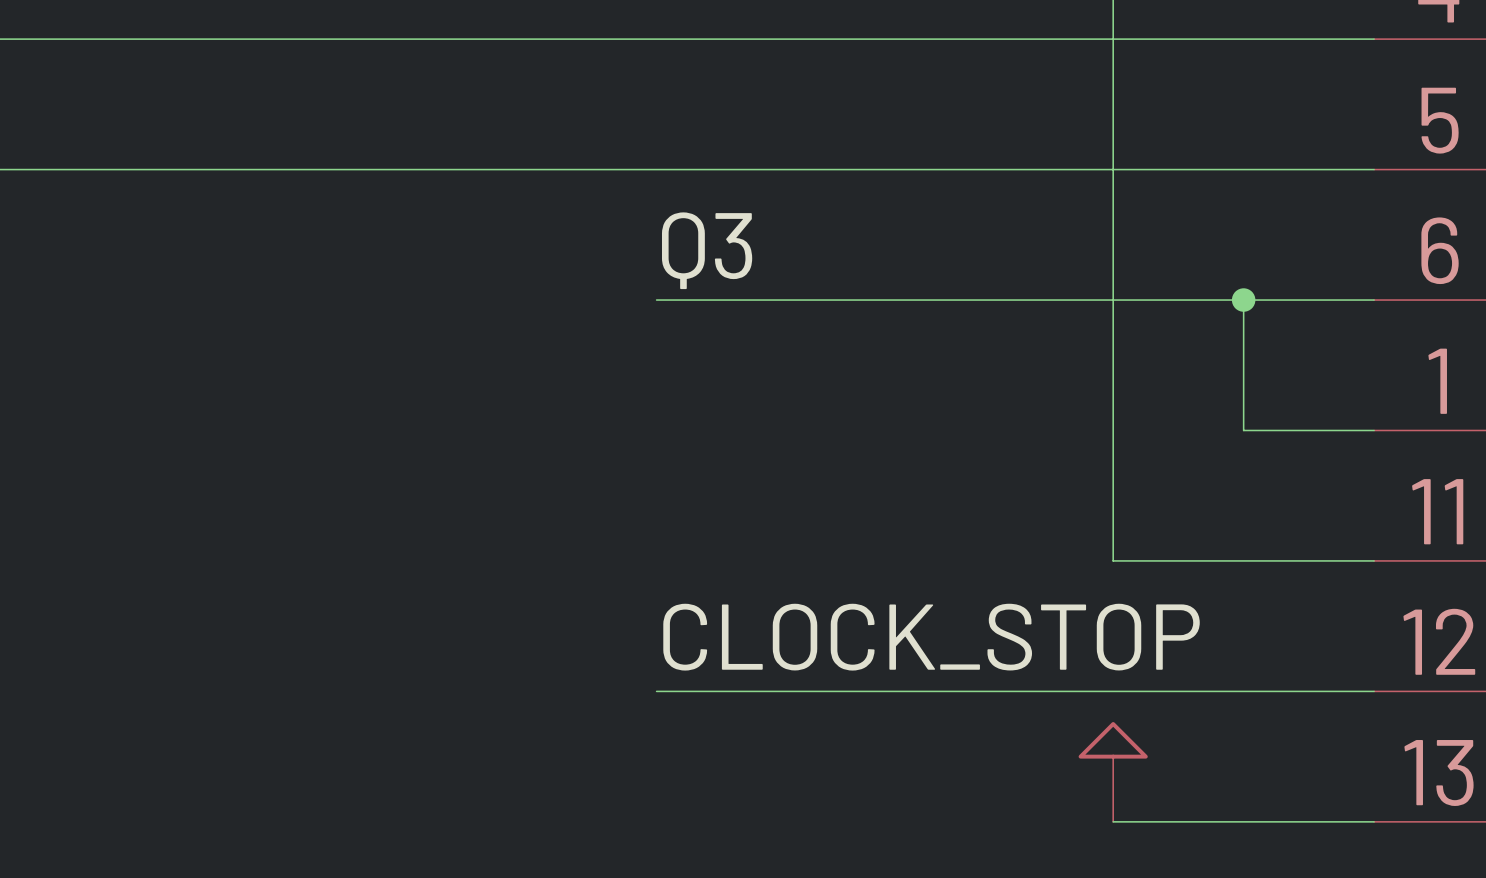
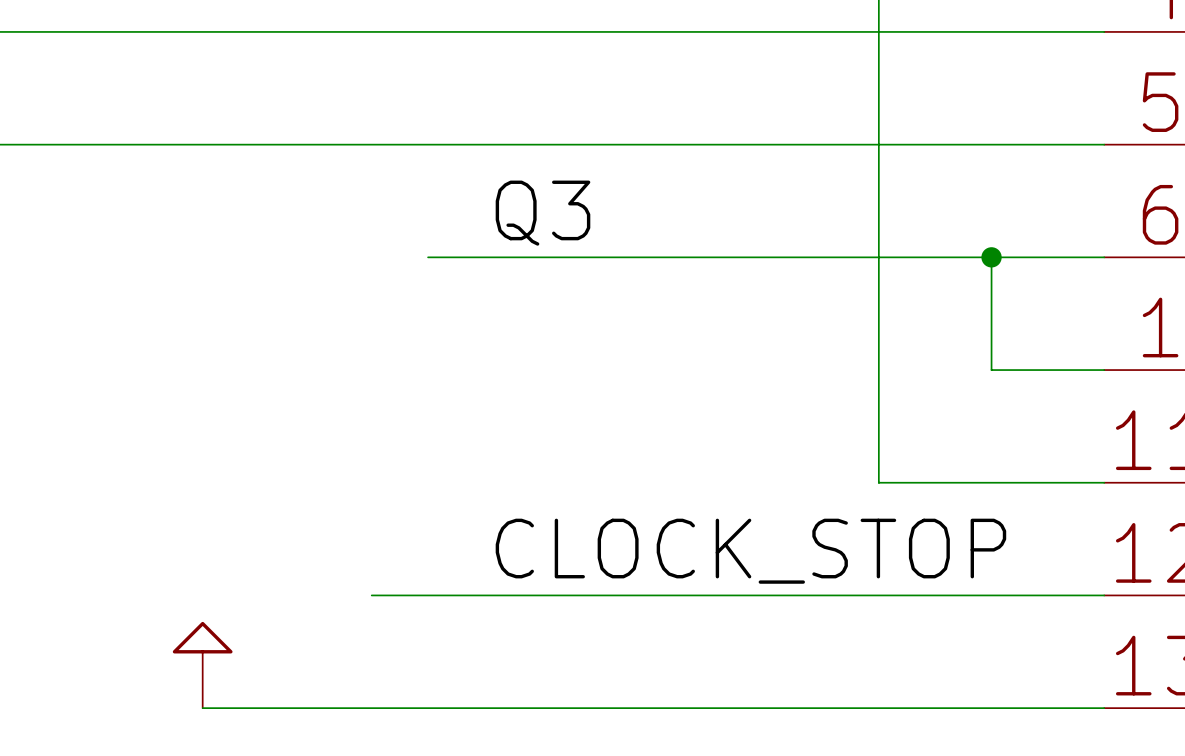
wire: none -> (428, 257) (484, 257)
wire: none -> (371, 595) (484, 595)
power symbol: none -> (202, 665)
power symbol: (1113, 771) -> none
wire: none -> (202, 708) (878, 708)

